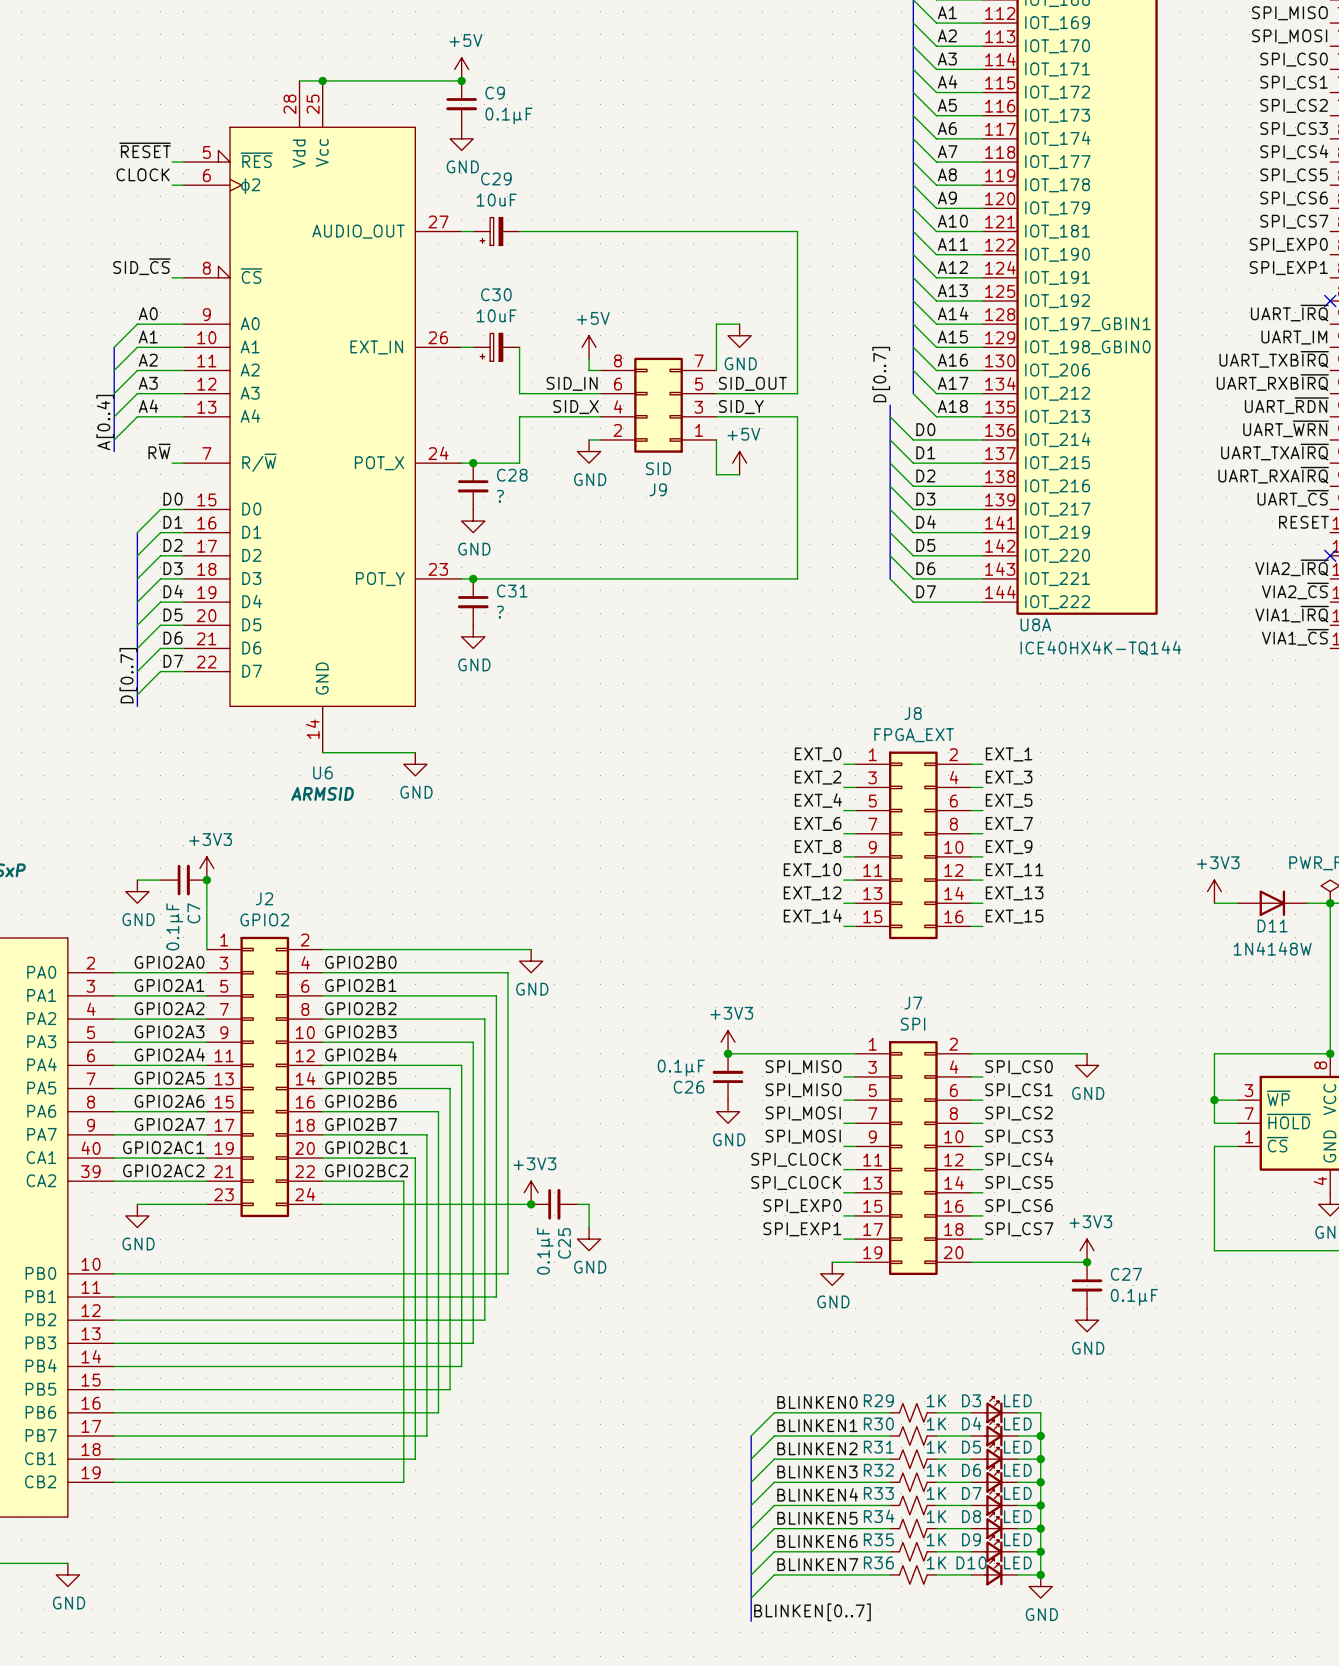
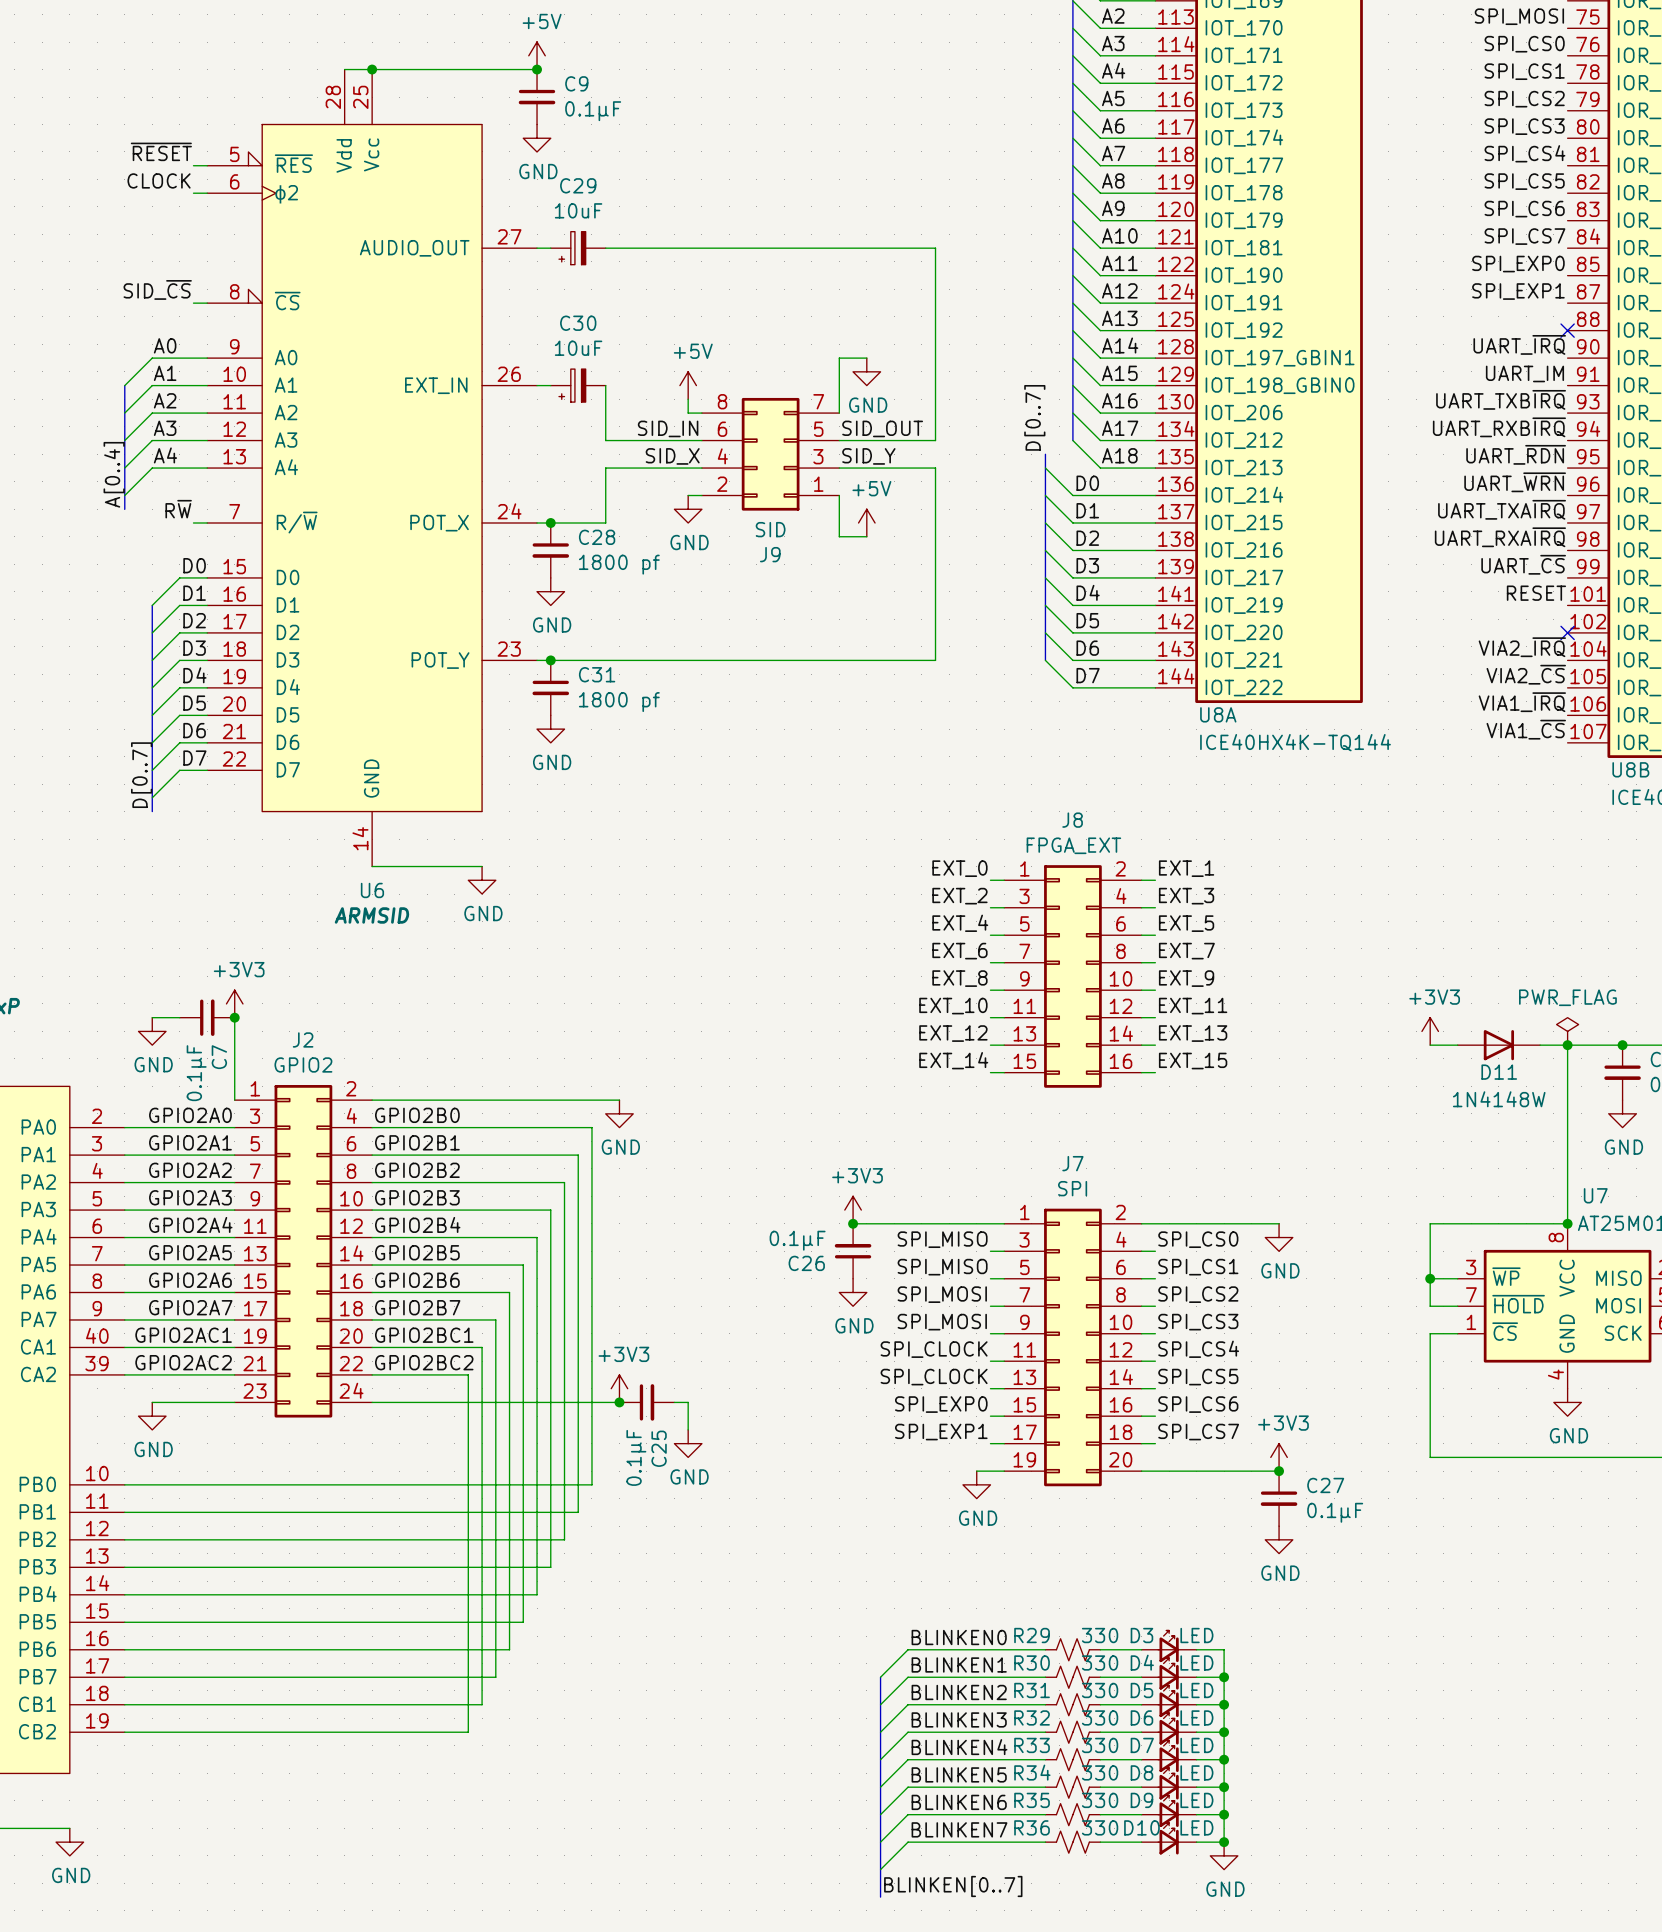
C28 value: ? (500, 496) -> 1800 pf (619, 564)
C31 value: ? (500, 612) -> 1800 pf (619, 702)
R29 value: 1K (936, 1400) -> 330 (1100, 1635)
R30 value: 1K (936, 1423) -> 330 (1100, 1663)
R31 value: 1K (936, 1447) -> 330 (1100, 1690)
R32 value: 1K (936, 1470) -> 330 (1100, 1717)
R33 value: 1K (936, 1493) -> 330 (1100, 1745)
R34 value: 1K (936, 1516) -> 330 (1100, 1772)
R35 value: 1K (936, 1539) -> 330 (1100, 1800)
R36 value: 1K (936, 1562) -> 330 (1100, 1827)

